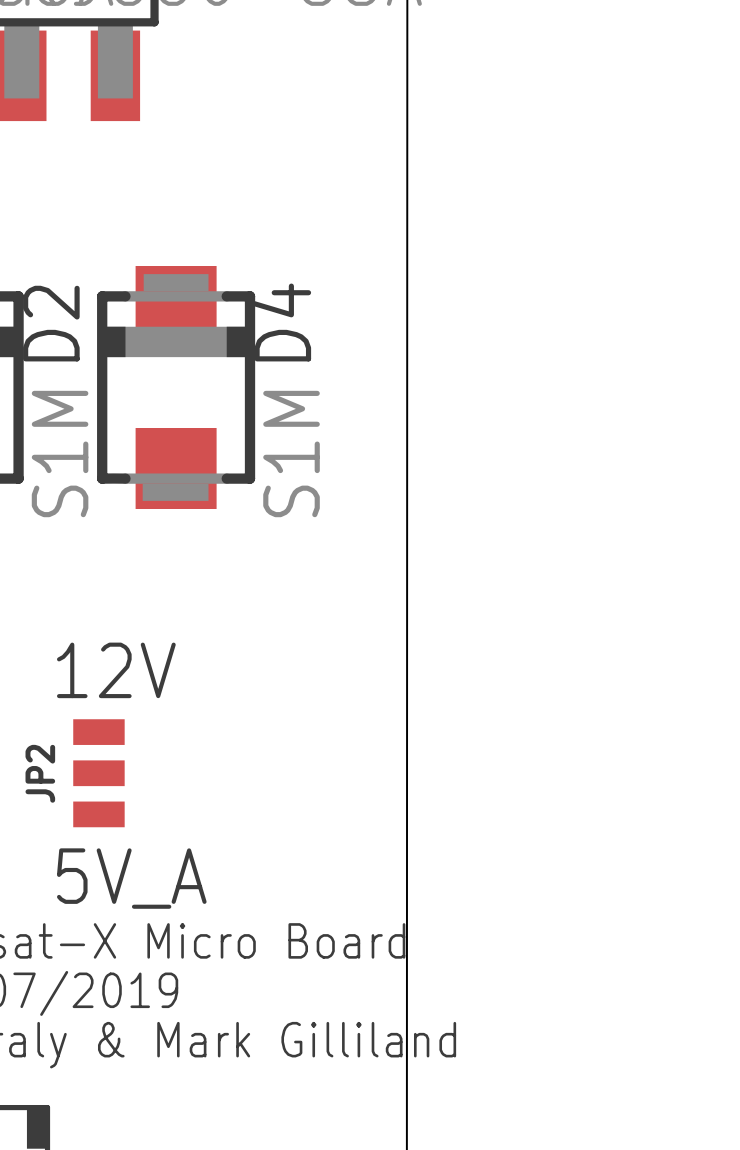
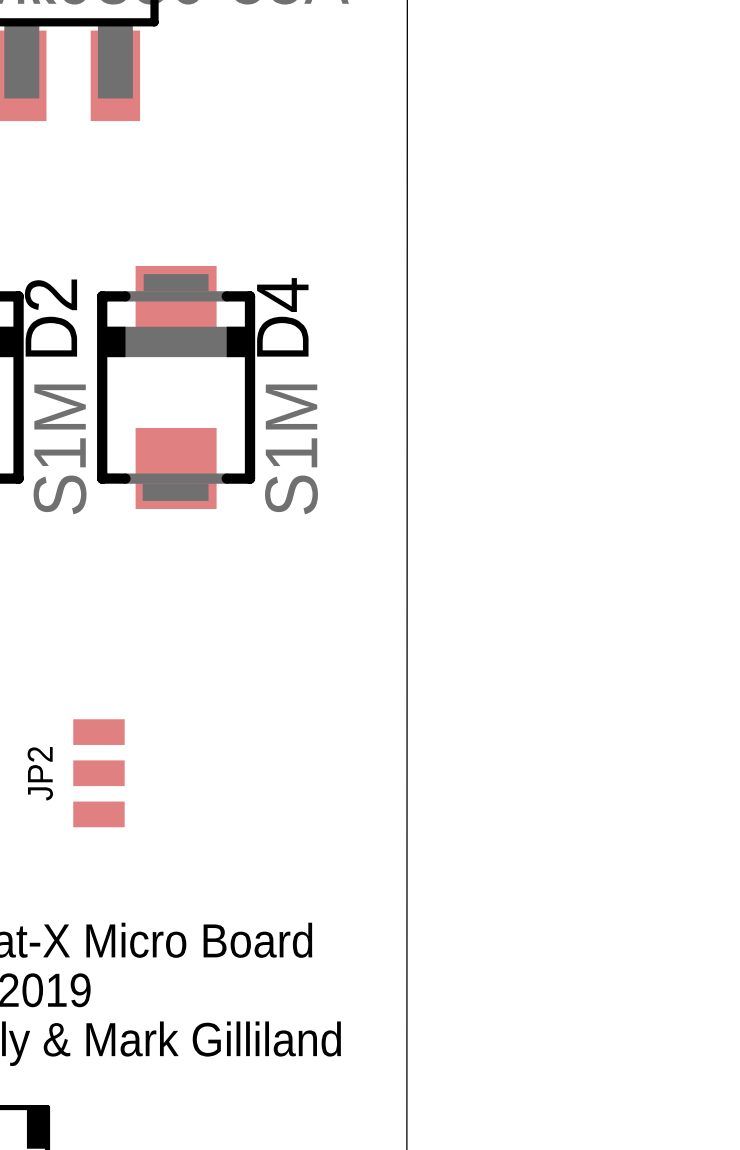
text: 12V (116, 670) -> none
text: 5V_A (131, 878) -> none

